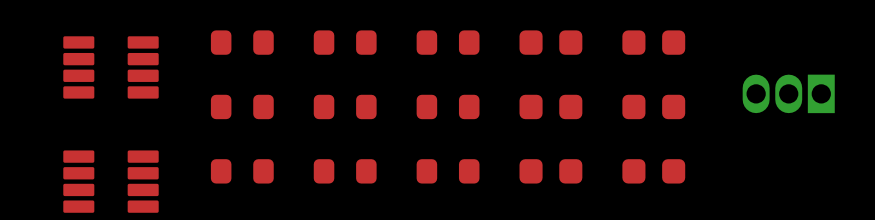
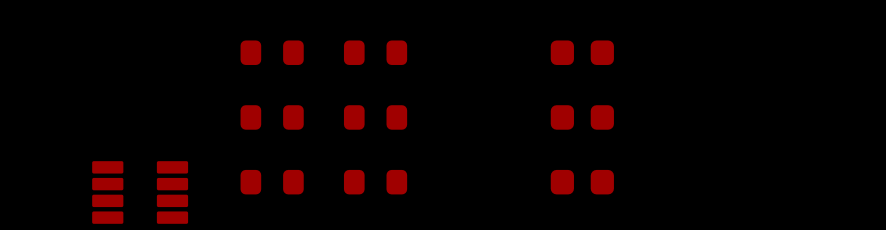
part: (448, 42) -> none
part: (653, 42) -> none
part: (110, 67) -> none
part: (788, 93) -> none
part: (448, 106) -> none
part: (653, 106) -> none
part: (448, 171) -> none
part: (653, 171) -> none

